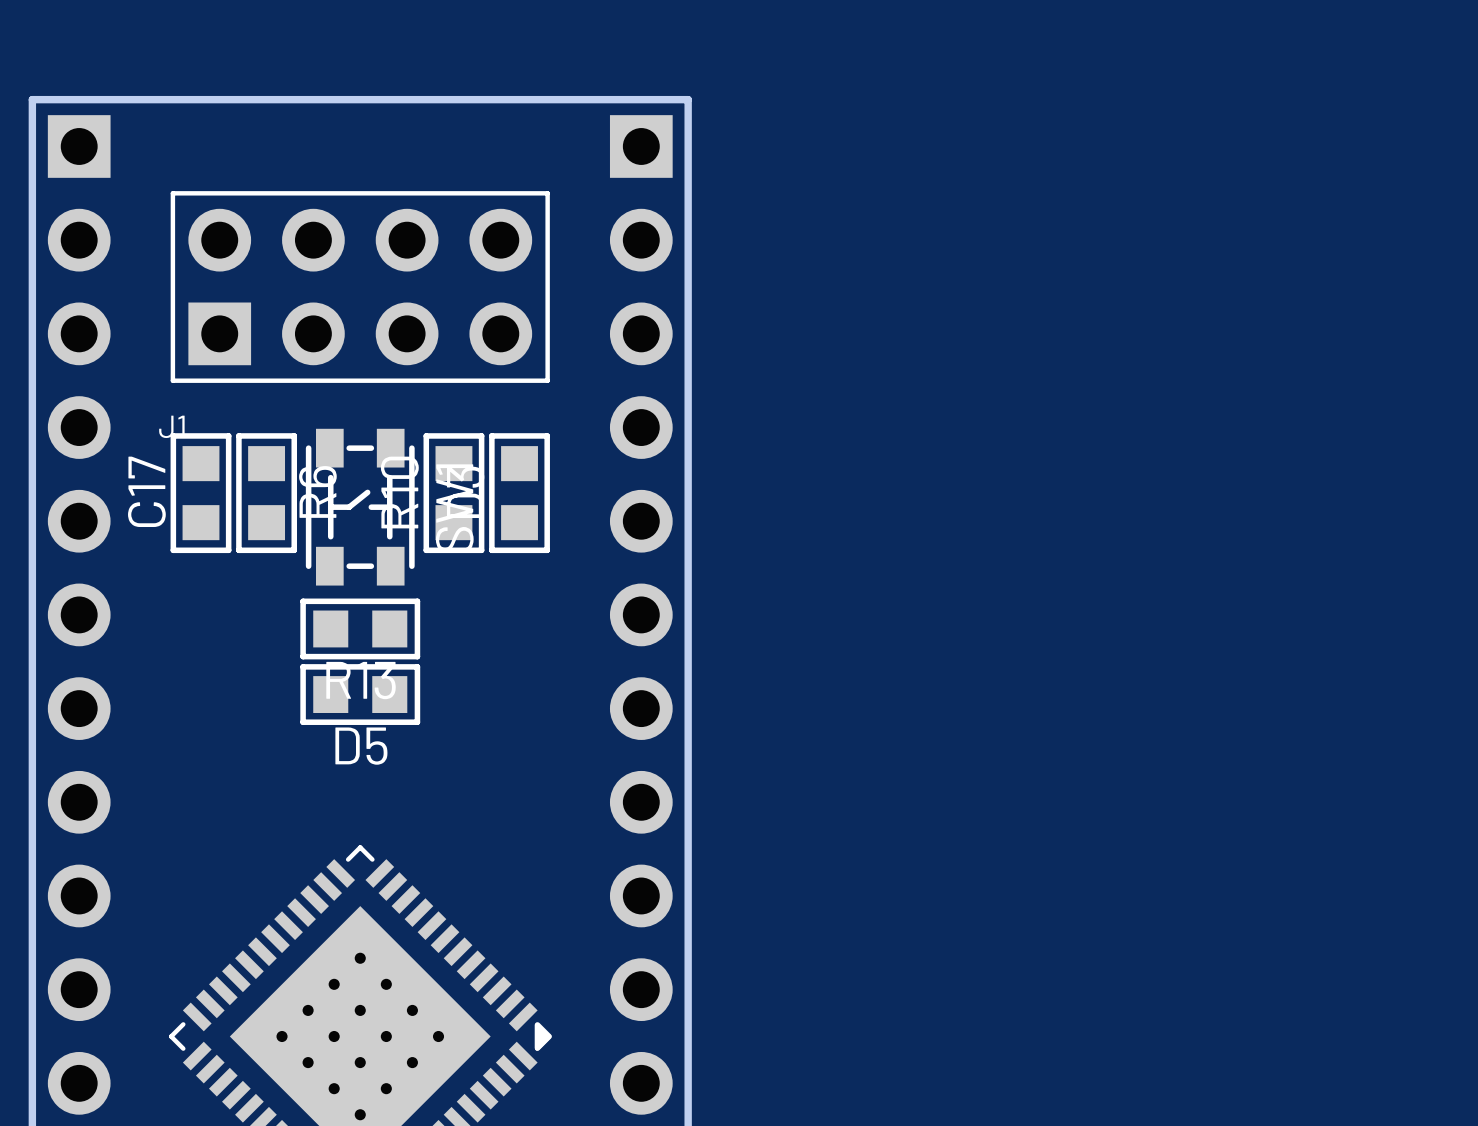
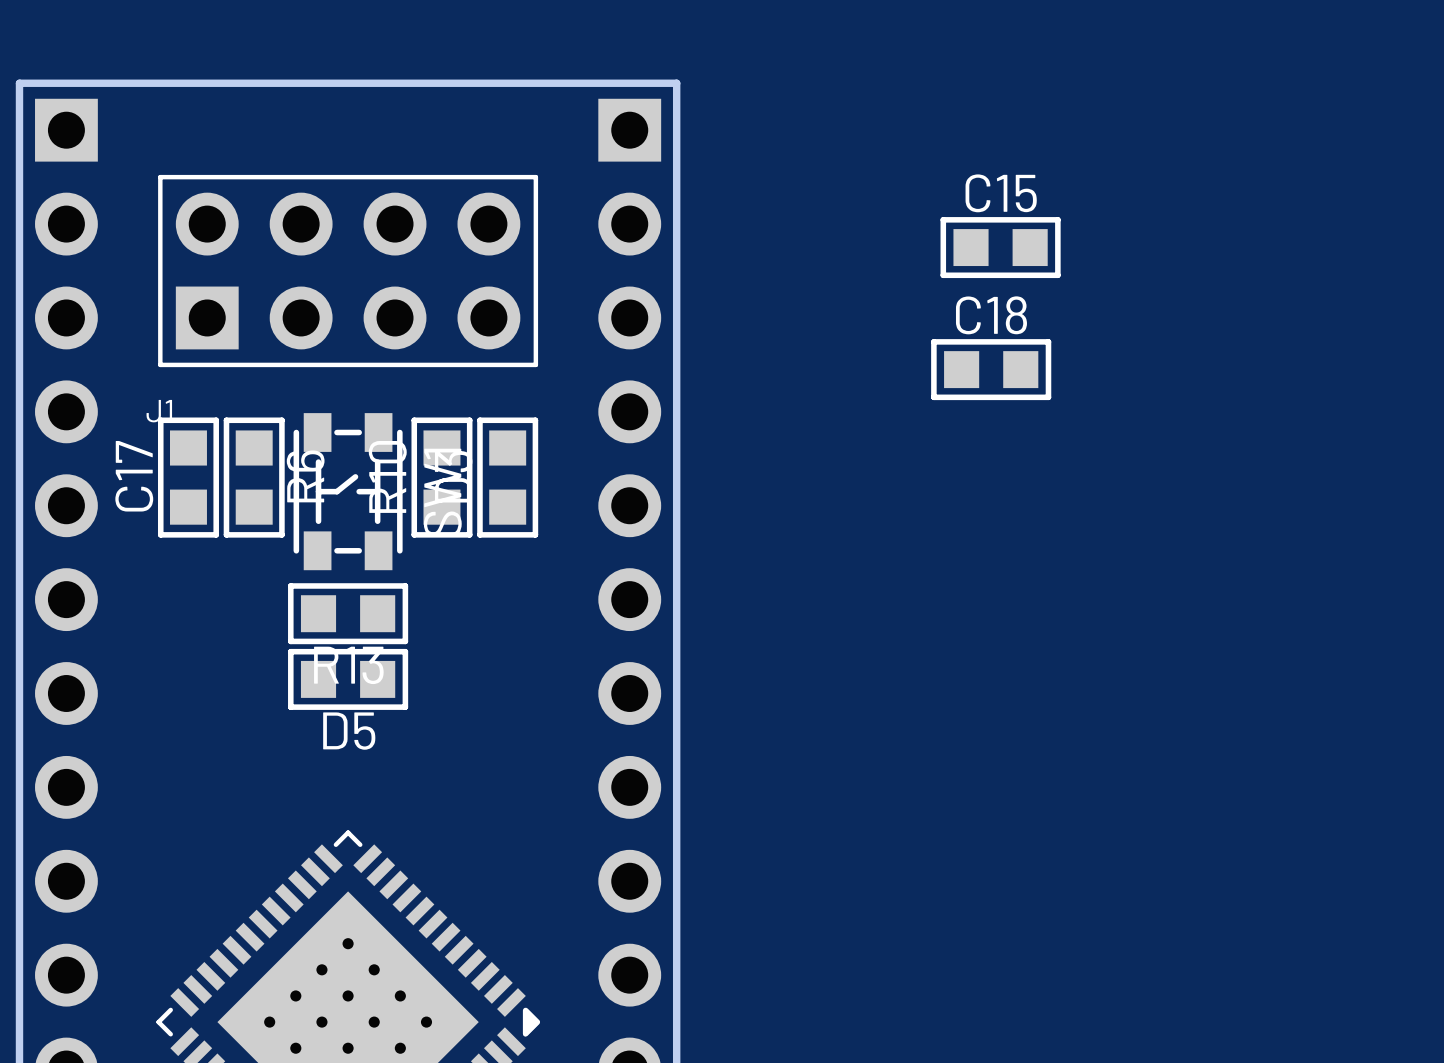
C15: none -> (1000, 247)
C18: none -> (991, 369)

